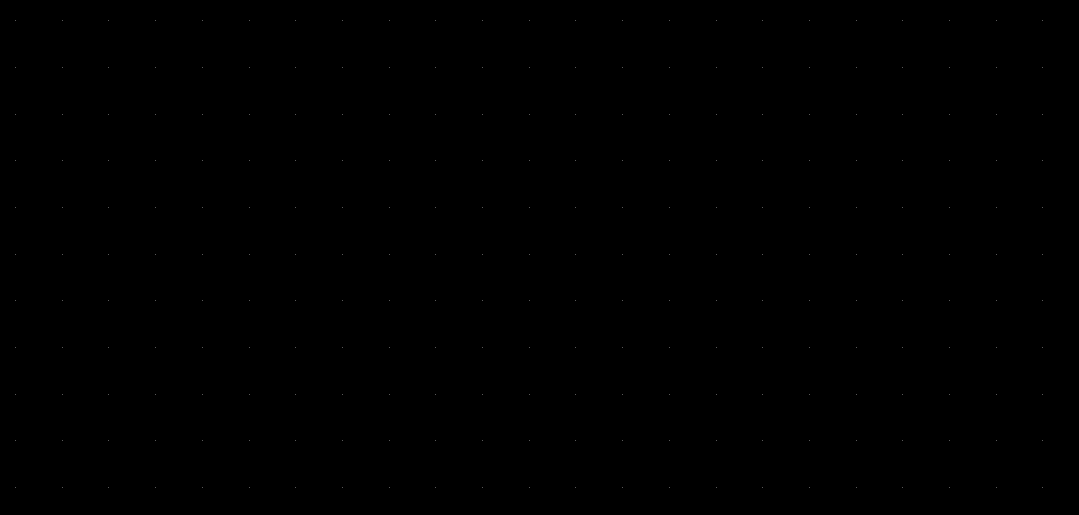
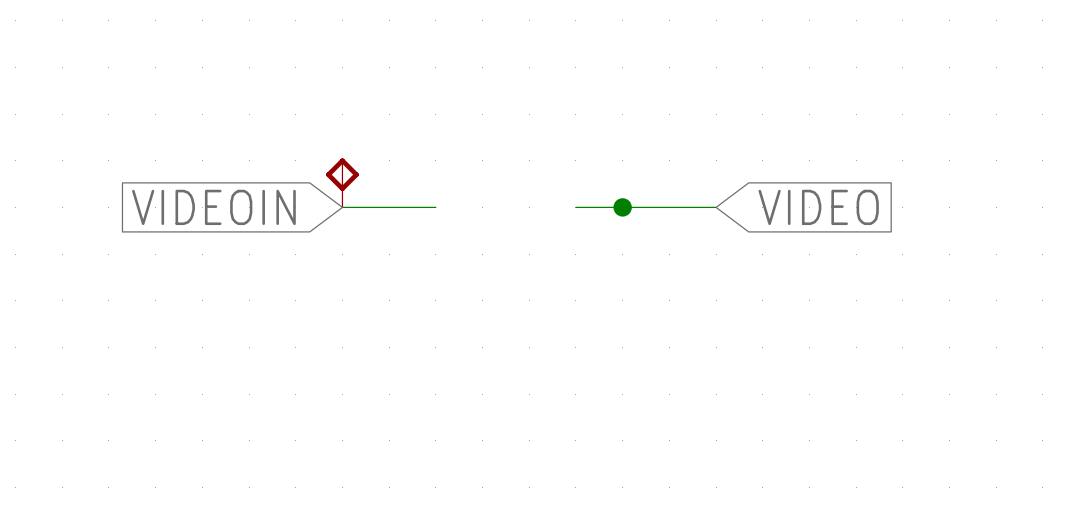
part: none -> (342, 182)
global label: none -> VIDEOIN (213, 207)
wire: none -> (342, 207) (435, 207)
wire: none -> (575, 207) (716, 207)
junction: none -> (622, 207)
global label: none -> VIDEO (818, 207)

